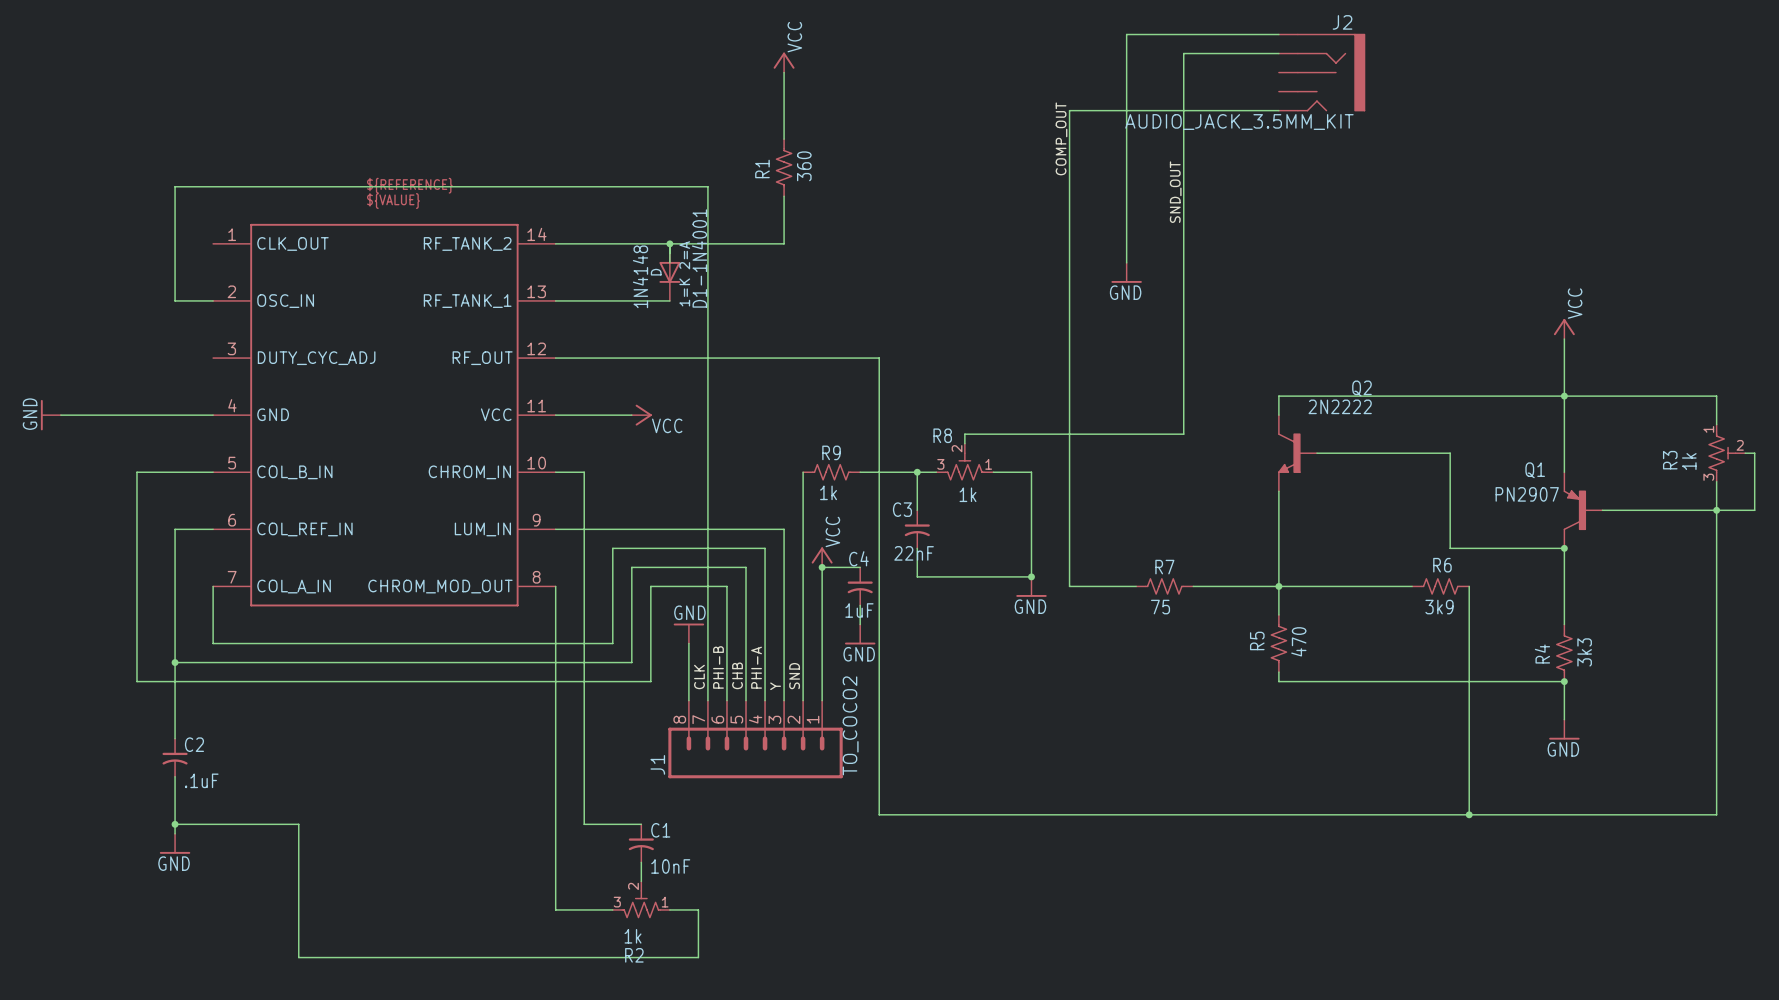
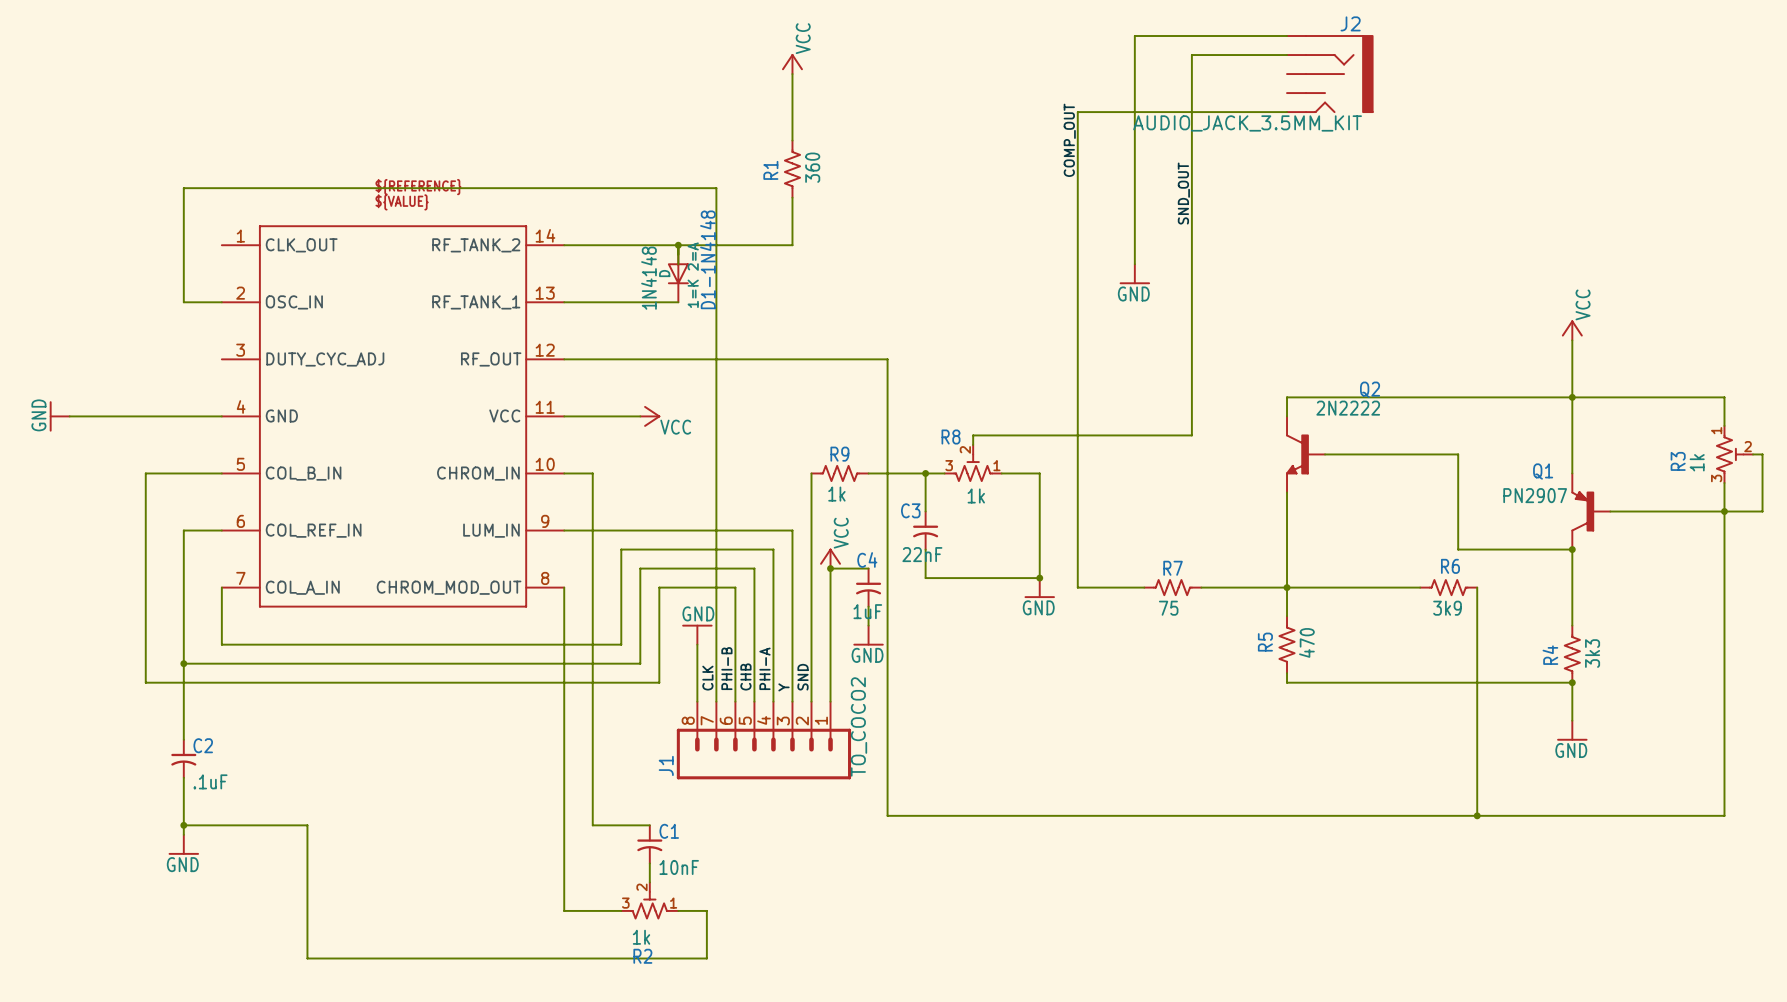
D1-1N4001 name: D1-1N4001 (699, 258) -> D1-1N4148 (707, 259)

